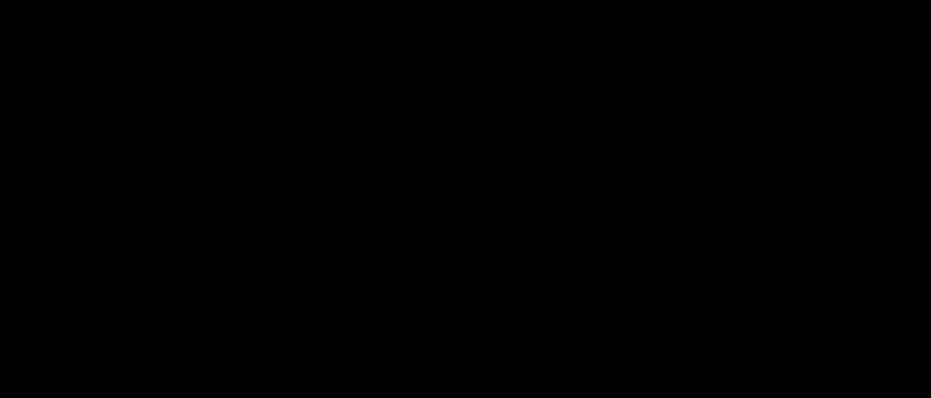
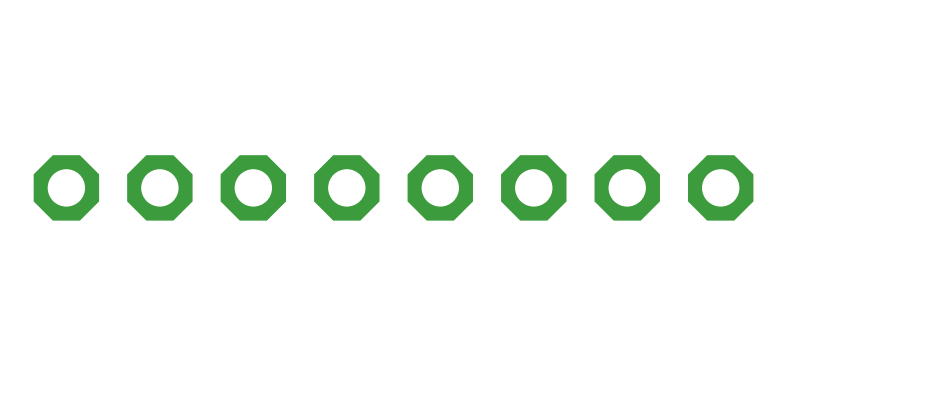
part: none -> (393, 187)

